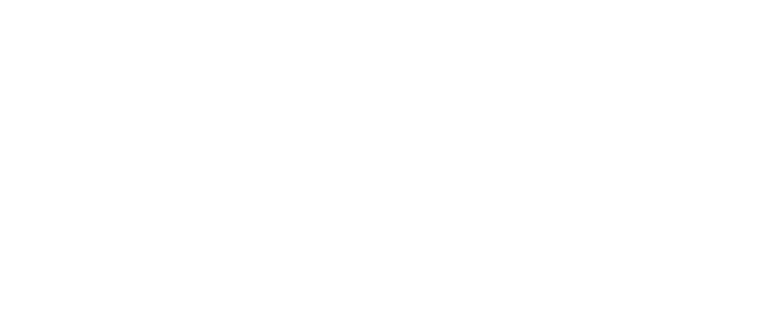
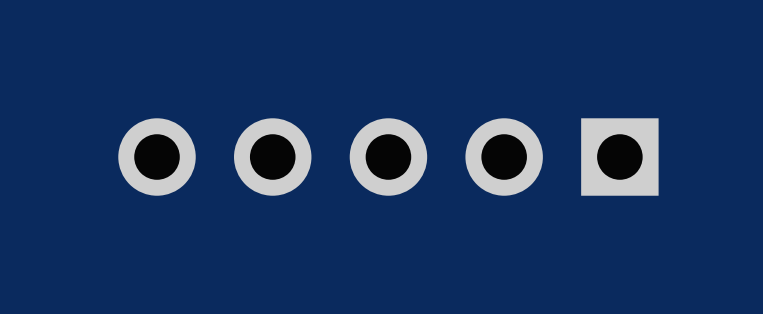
part: none -> (388, 157)

